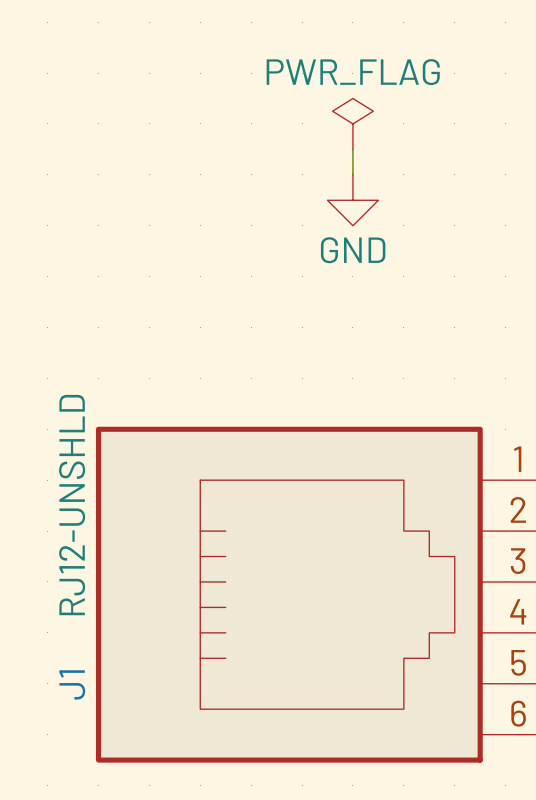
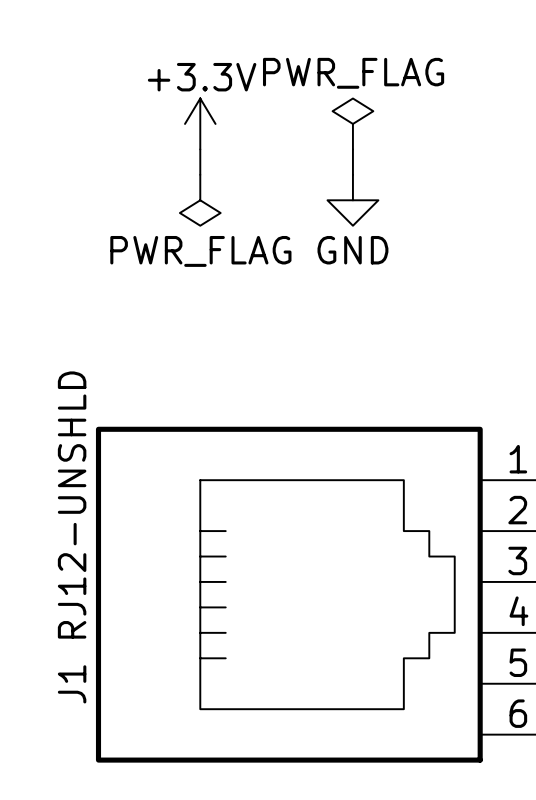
power symbol: none -> +3.3V (200, 123)
wire: none -> (200, 149) (200, 174)
power symbol: none -> PWR_FLAG (200, 200)

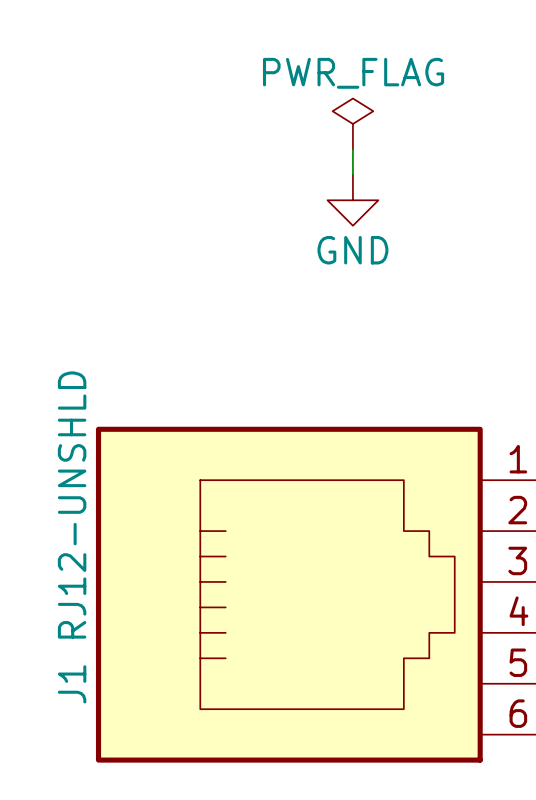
power symbol: +3.3V (200, 123) -> none
wire: (200, 149) (200, 174) -> none
power symbol: PWR_FLAG (200, 200) -> none

